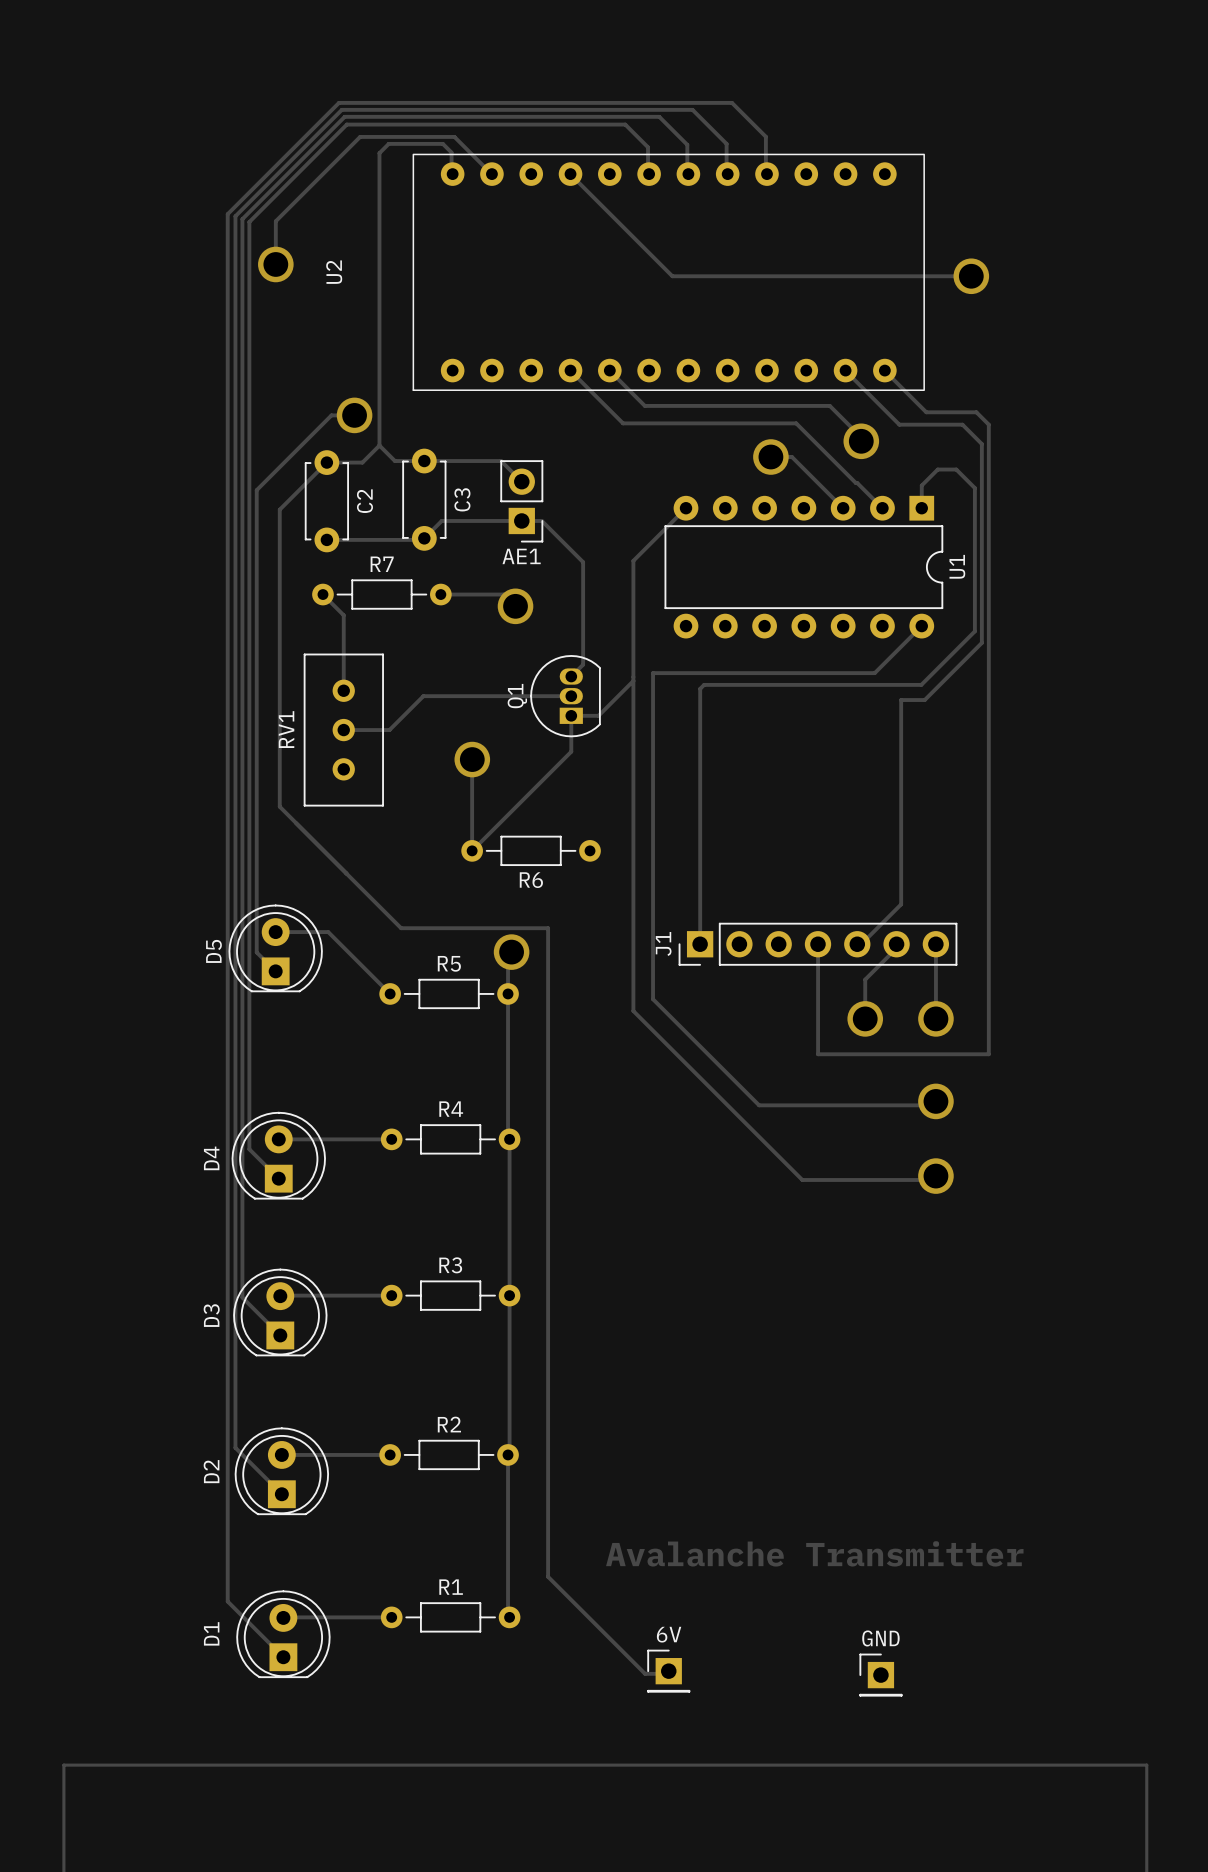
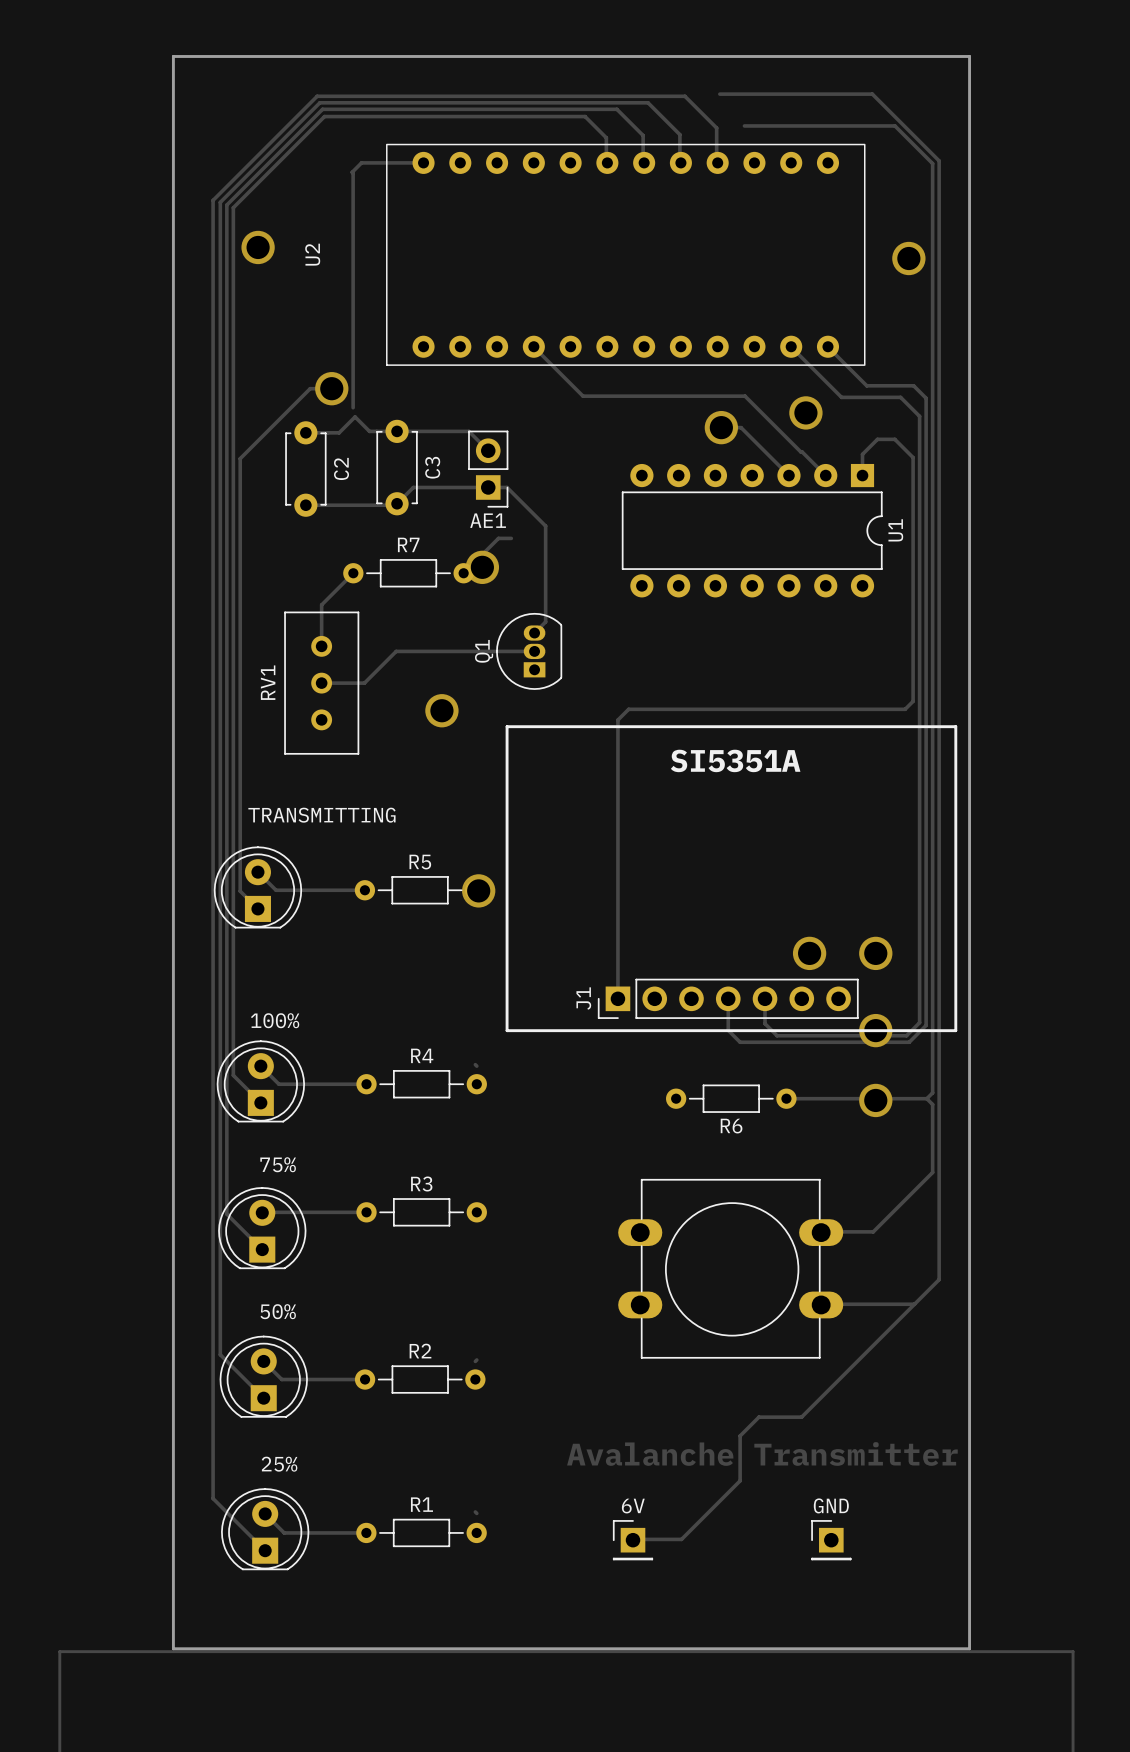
board edge: none -> (173, 56) (969, 56) (969, 1648) (173, 1648) (173, 56)
track: none -> (719, 94) (872, 94) (939, 160) (939, 1279) (801, 1417) (758, 1417) (740, 1435) (740, 1480) (681, 1539) (633, 1540)
track: none -> (744, 125) (895, 125) (932, 163) (932, 1092) (926, 1098)
track: (451, 173) (451, 152) (442, 143) (388, 143) (379, 153) (379, 445) -> none
track: (490, 173) (454, 136) (360, 136) (275, 221) (275, 264) -> none
track: (569, 173) (672, 276) (971, 276) -> none
track: none -> (423, 162) (361, 162) (352, 172) (353, 407)
track: (608, 369) (644, 405) (829, 405) (861, 437) (861, 441) -> none
track: (988, 424) (988, 1054) (818, 1054) (818, 948) -> (925, 397) (926, 1025) (909, 1042) (740, 1042) (728, 1030) (728, 998)
track: (981, 444) (981, 642) (924, 700) (901, 700) (901, 904) (857, 948) -> (918, 415) (919, 1022) (906, 1035) (777, 1035) (765, 1023) (765, 998)
track: (326, 462) (279, 509) (279, 806) (346, 873) -> none
track: (974, 488) (974, 631) (921, 684) (704, 684) (700, 688) (700, 948) -> (912, 456) (913, 701) (905, 709) (628, 709) (617, 720) (617, 998)
track: (686, 508) (633, 560) (633, 1011) (802, 1180) (932, 1180) (935, 1176) -> none
track: none -> (511, 538) (498, 538) (463, 573)
track: (322, 594) (343, 615) (343, 646) -> (353, 573) (321, 604)
R7 position: (381, 594) -> (408, 573)
track: (440, 594) (503, 594) (515, 606) -> none
track: (921, 626) (874, 673) (653, 673) (653, 999) (759, 1105) (932, 1105) (935, 1101) -> none
track: (633, 680) (598, 715) (571, 715) (571, 751) (472, 850) (472, 759) -> none
line: none -> (507, 726) (955, 726) (955, 1030) (507, 1030) (507, 726)
text: none -> SI5351A (735, 760)
track: (295, 823) (401, 928) (548, 928) (548, 1576) (645, 1673) (661, 1673) -> none
R6 position: (531, 850) -> (731, 1098)
track: (275, 932) (328, 932) (390, 993) -> (257, 872) (276, 890) (364, 890)
J1 position: (817, 944) -> (728, 998)
track: (896, 948) (865, 979) (865, 1018) -> none
track: (935, 948) (935, 1018) -> none
D5 name: D5 (213, 951) -> TRANSMITTING (321, 815)
track: (511, 952) (508, 955) (508, 1137) -> none
R5 position: (449, 993) -> (420, 890)
track: (278, 1139) (391, 1139) -> (260, 1066) (278, 1084) (366, 1084)
R4 position: (450, 1139) -> (421, 1084)
track: (509, 1139) (509, 1453) -> none
D4 name: D4 (211, 1158) -> 100% (275, 1020)
track: none -> (786, 1098) (926, 1098)
track: none -> (926, 1098) (932, 1104) (932, 1172) (873, 1231) (816, 1231)
D3 name: D3 (211, 1315) -> 75% (278, 1164)
part: none -> (730, 1268)
track: none -> (816, 1304) (914, 1304)
track: (281, 1454) (390, 1454) -> (263, 1361) (281, 1379) (365, 1379)
R2 position: (449, 1454) -> (420, 1379)
track: (508, 1454) (508, 1615) -> none
D2 name: D2 (211, 1471) -> 50% (278, 1311)
track: (391, 1617) (283, 1617) -> (366, 1532) (284, 1532) (265, 1513)
R1 position: (450, 1617) -> (421, 1532)
D1 name: D1 (211, 1633) -> 25% (279, 1464)
6V position: (668, 1671) -> (633, 1540)
GND position: (880, 1675) -> (831, 1540)

